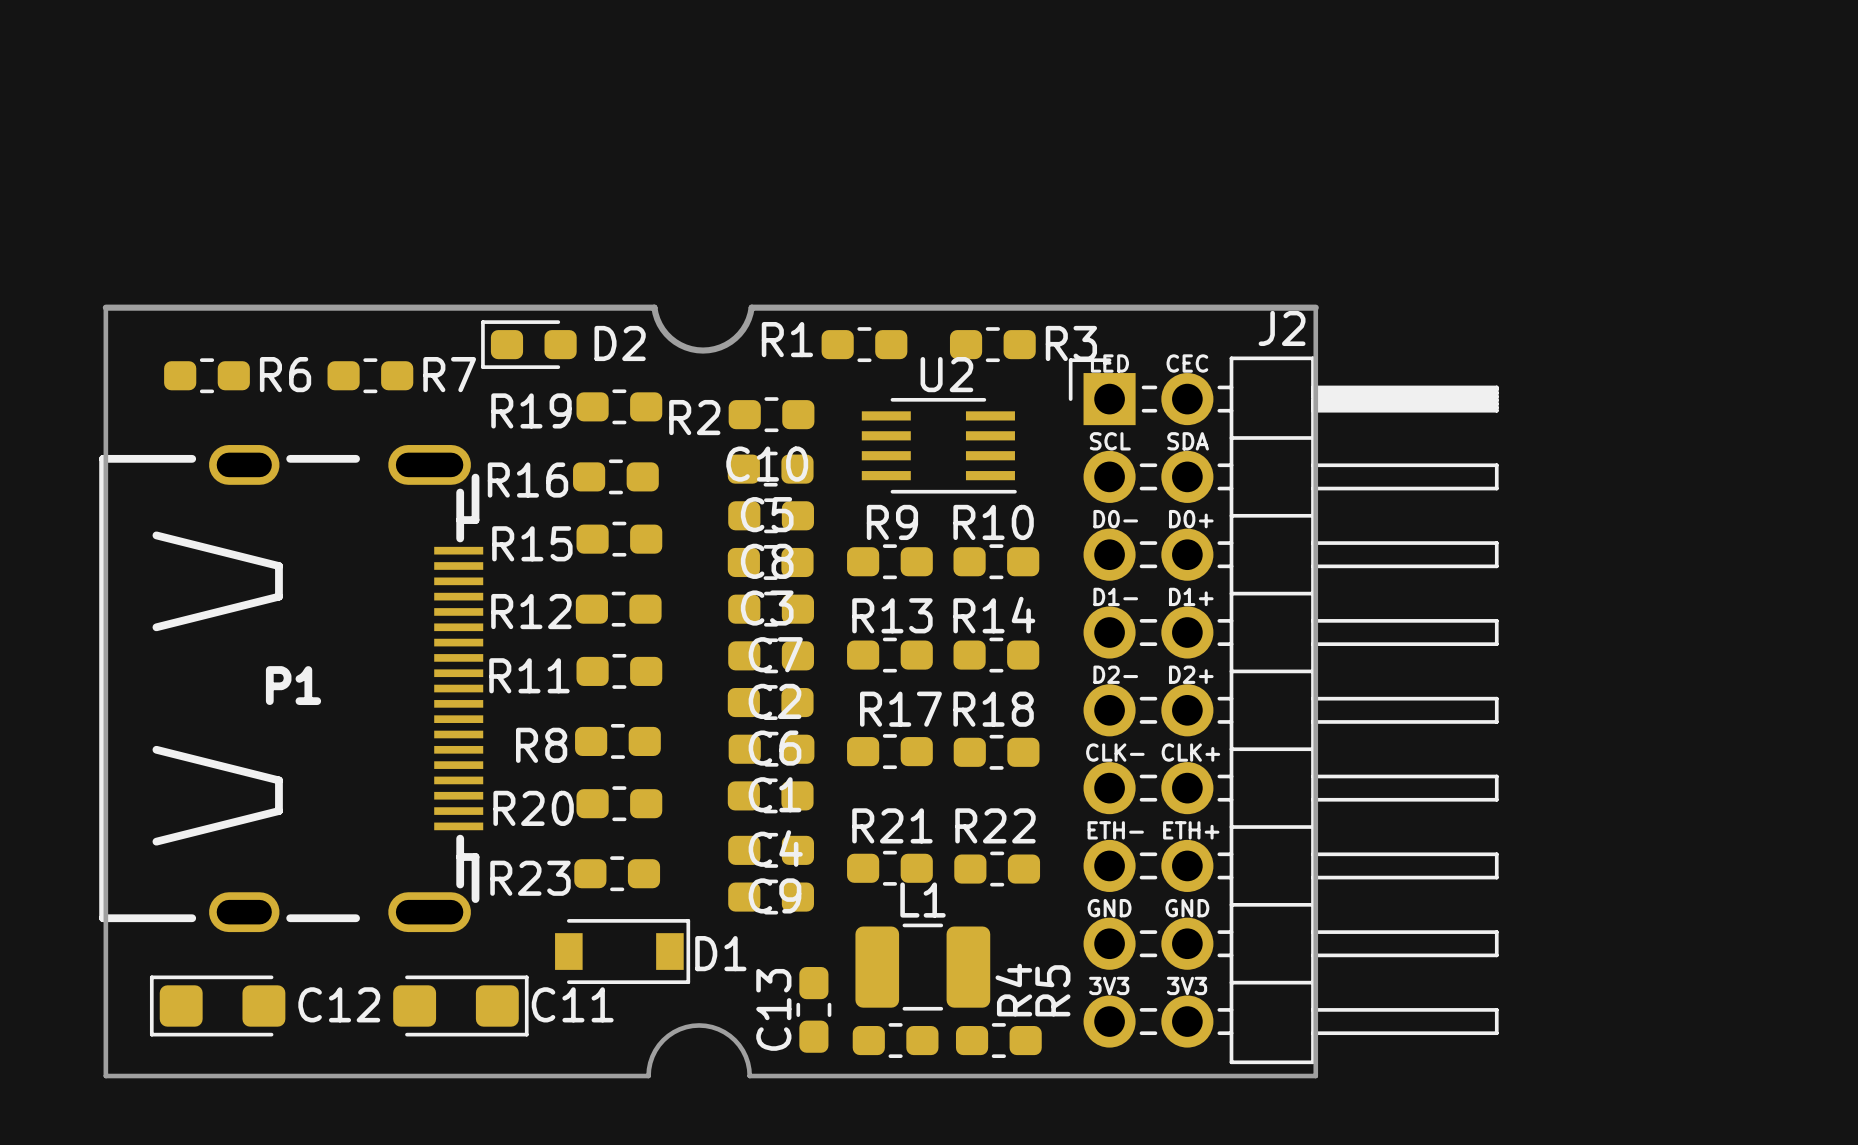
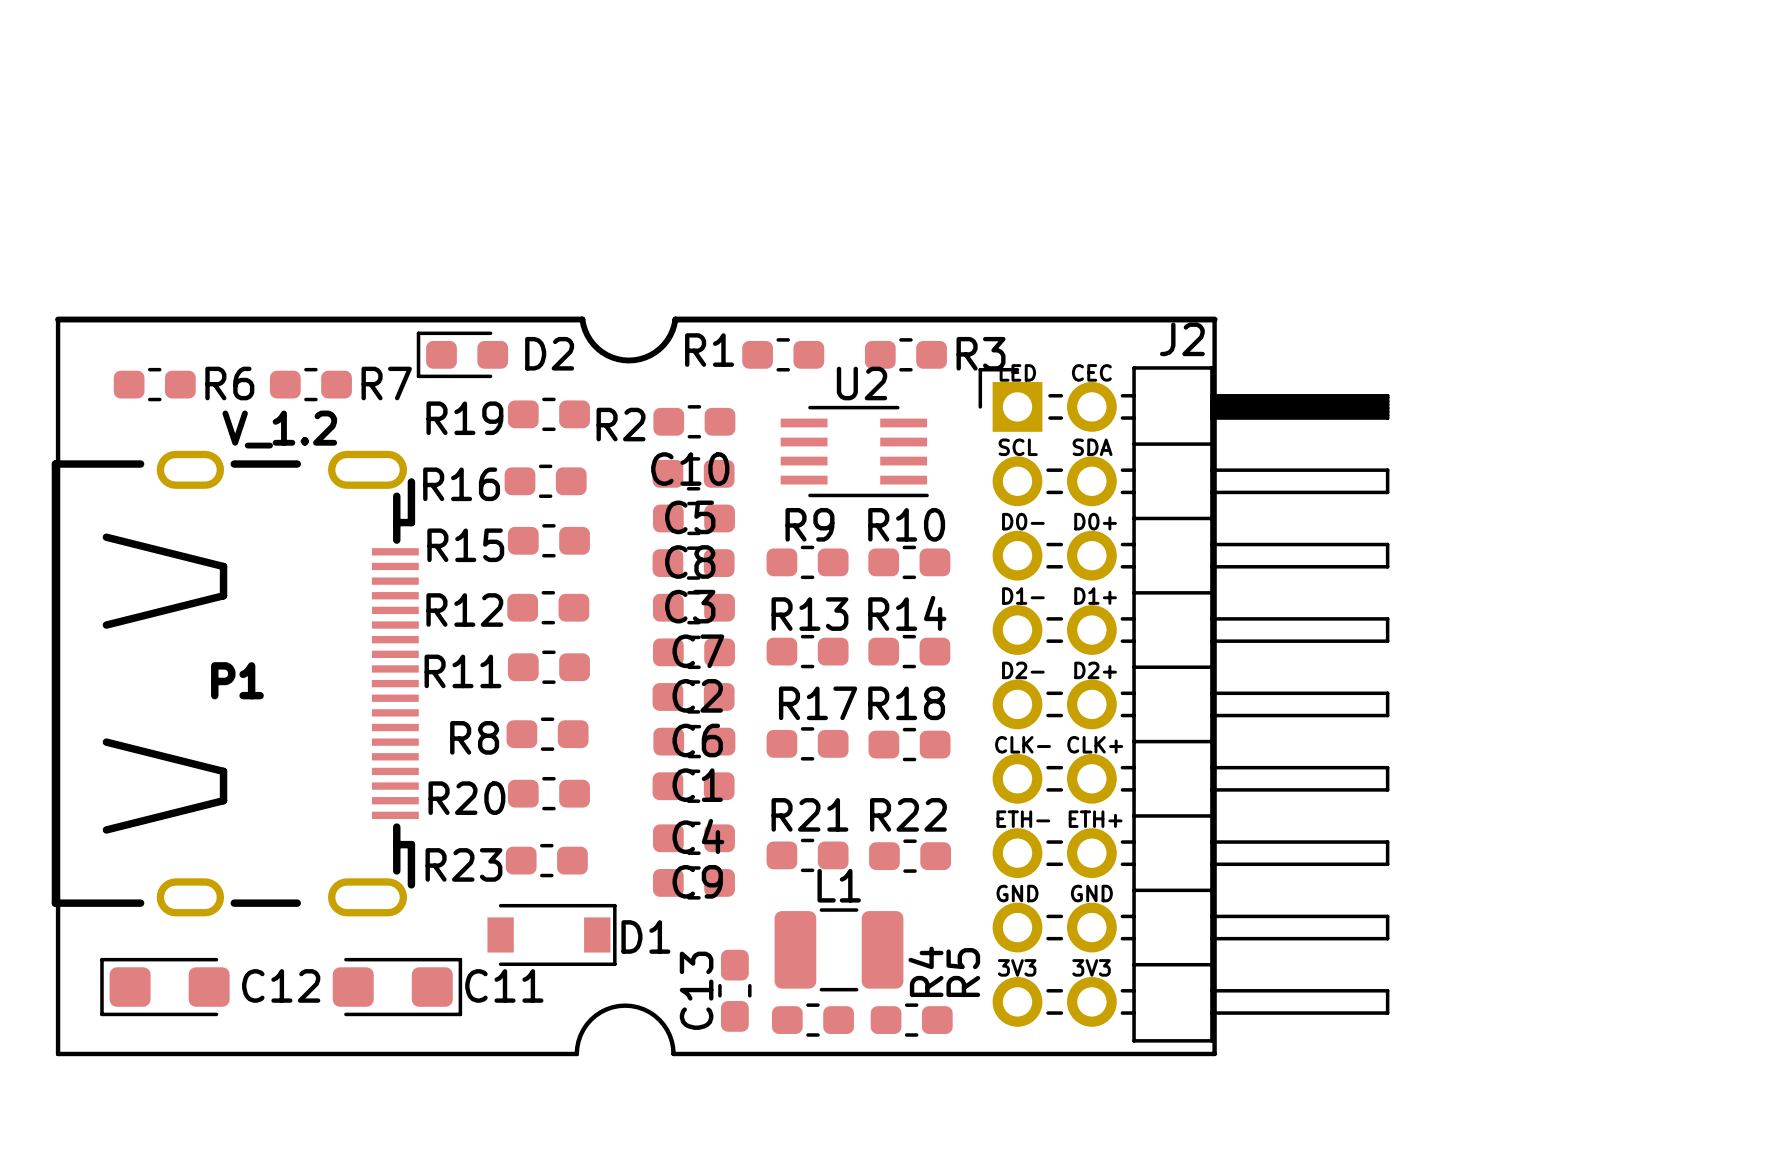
text: none -> V_1.2 (279, 429)

